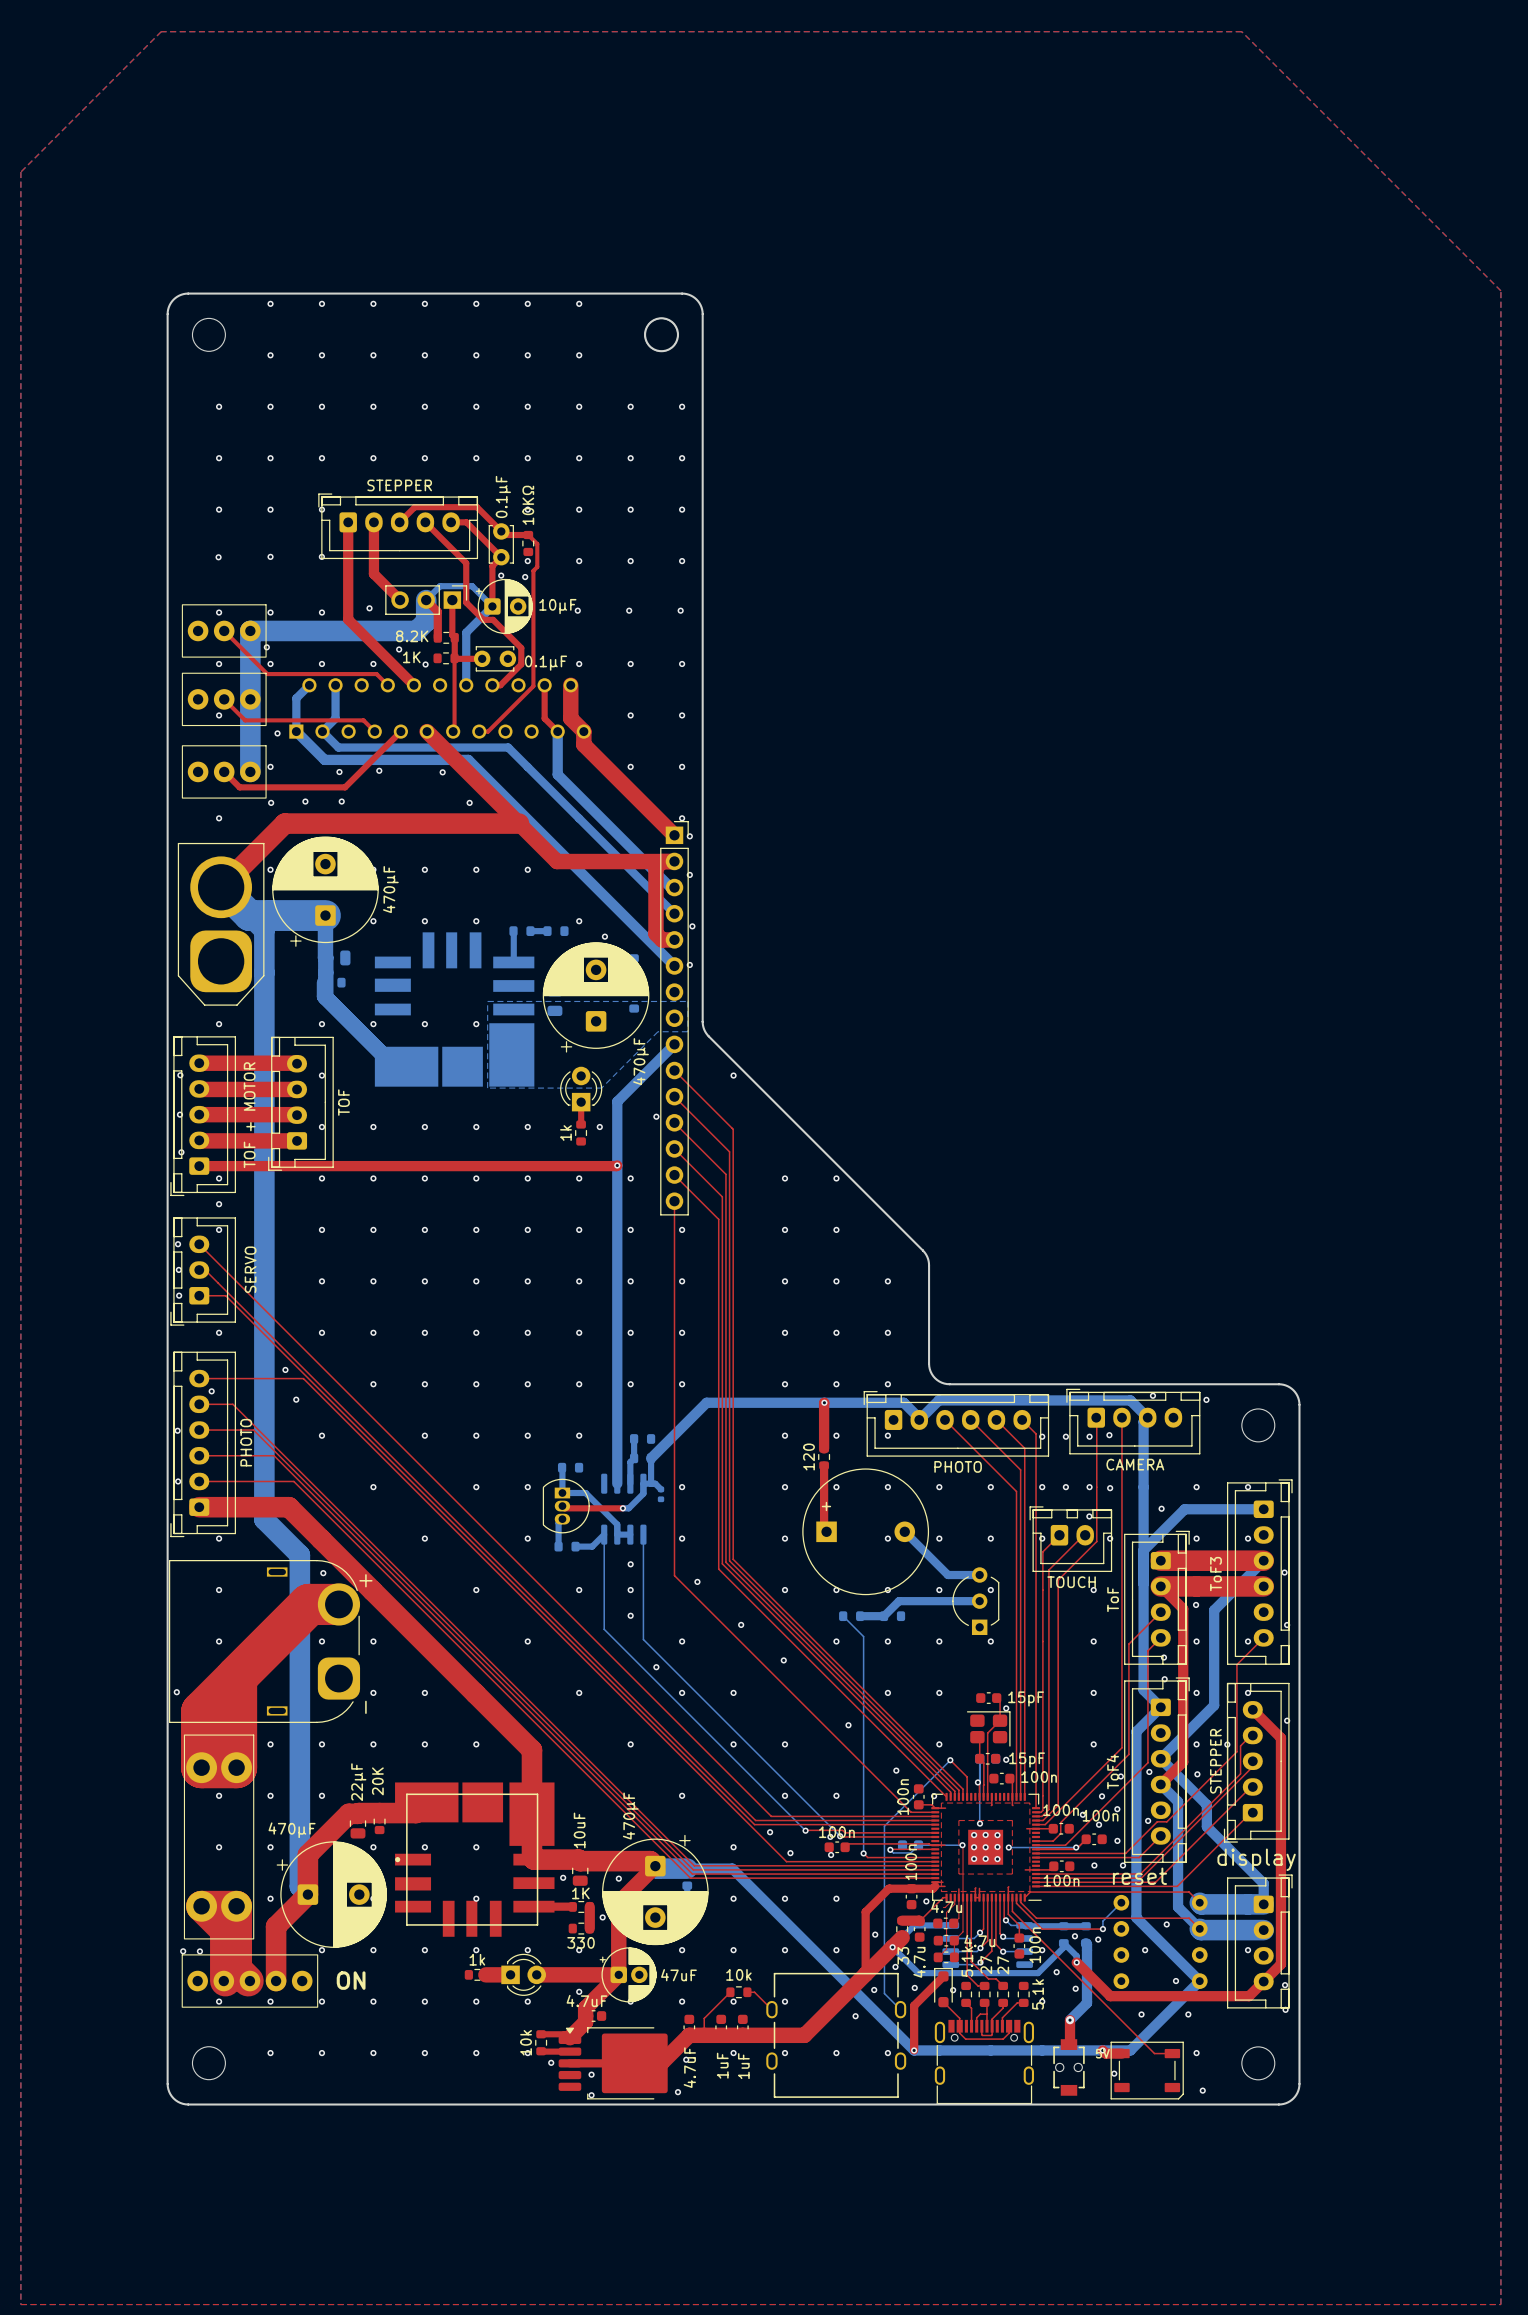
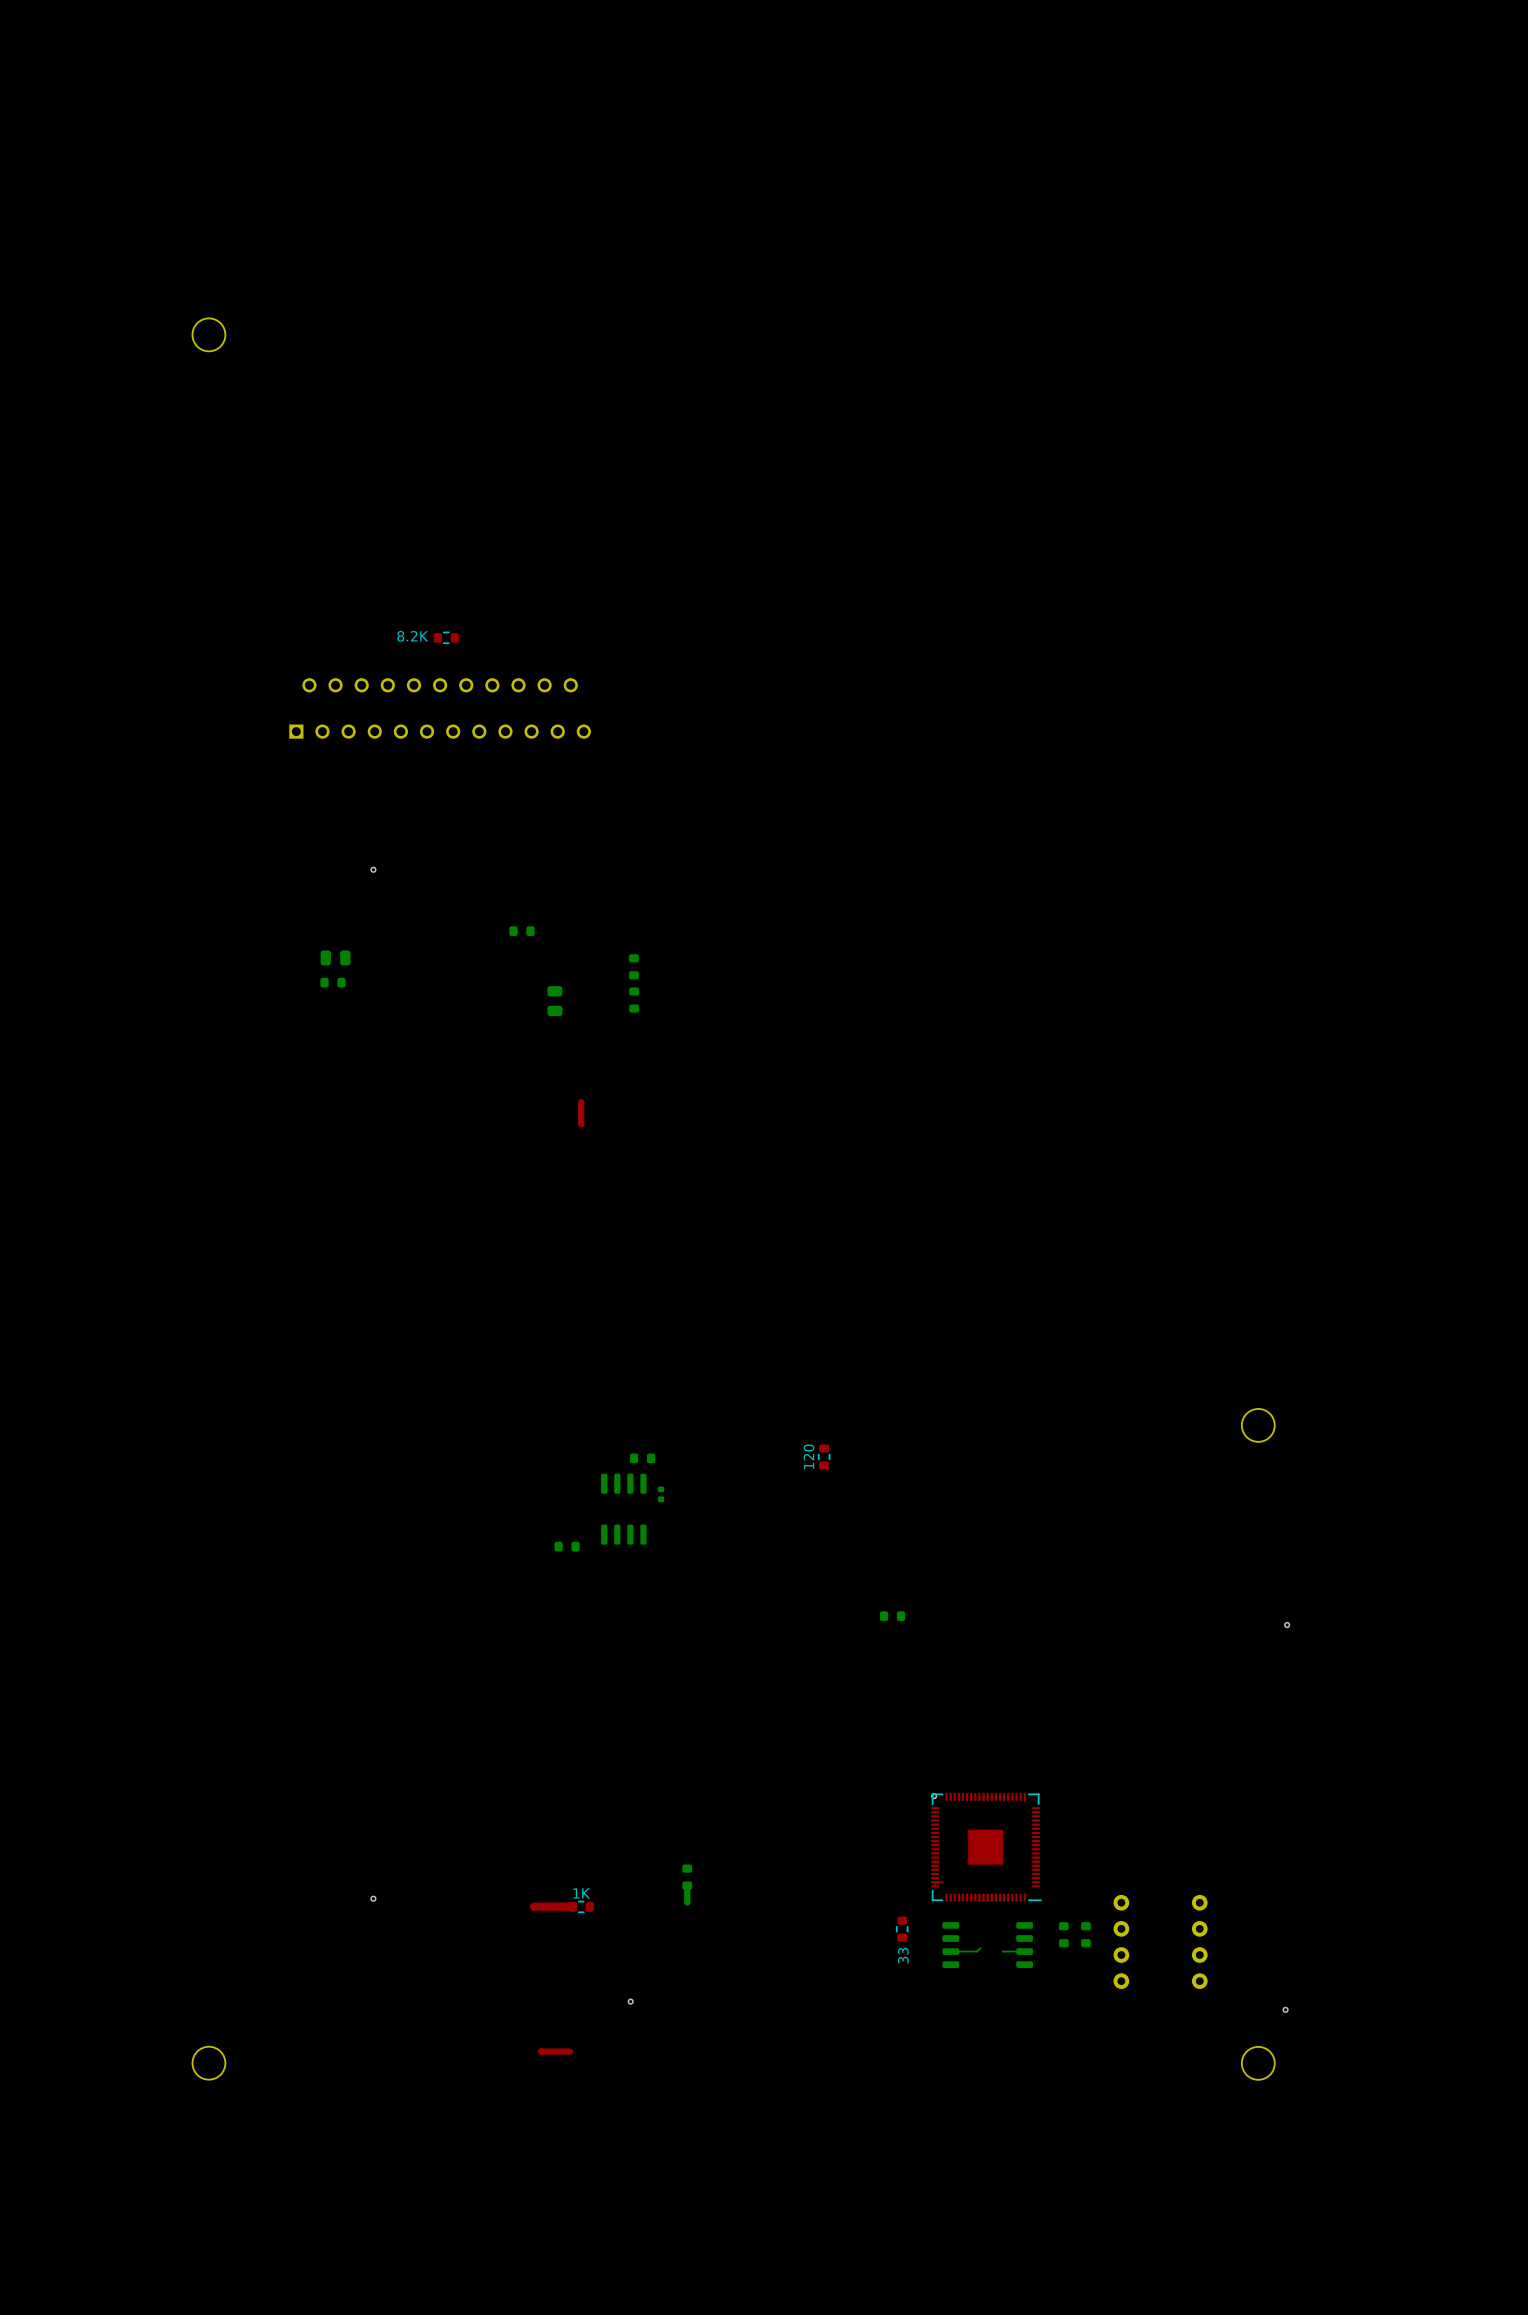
top zone outline: (161, 31) (1241, 31) (1500, 290) (1500, 2304) (20, 2304) (20, 172) (161, 31) -> none
board edge: (188, 293) (682, 293) (691, 295) (699, 303) (702, 314) (702, 1021) (705, 1031) (925, 1253) (929, 1265) (929, 1366) (933, 1376) (939, 1381) (949, 1384) (1278, 1384) (1289, 1387) (1298, 1398) (1299, 2083) (1296, 2094) (1289, 2101) (1278, 2104) (188, 2104) (177, 2101) (170, 2094) (167, 2083) (167, 314) (168, 307) (173, 299) (179, 295) (188, 293) -> none
via: (270, 303) -> none
via: (321, 303) -> none
via: (373, 303) -> none
via: (424, 303) -> none
via: (476, 303) -> none
via: (527, 303) -> none
via: (579, 303) -> none
round board edge: [644, 317, 680, 353] -> none
via: (270, 355) -> none
via: (321, 355) -> none
via: (373, 355) -> none
via: (424, 355) -> none
via: (476, 355) -> none
via: (527, 355) -> none
via: (579, 355) -> none
via: (219, 406) -> none
via: (270, 406) -> none
via: (321, 406) -> none
via: (373, 406) -> none
via: (424, 406) -> none
via: (476, 406) -> none
via: (527, 406) -> none
via: (579, 406) -> none
via: (630, 406) -> none
via: (682, 406) -> none
via: (219, 458) -> none
via: (270, 458) -> none
via: (321, 458) -> none
via: (373, 458) -> none
via: (424, 458) -> none
via: (476, 458) -> none
via: (527, 458) -> none
via: (579, 458) -> none
via: (630, 458) -> none
via: (682, 458) -> none
via: (219, 509) -> none
via: (270, 509) -> none
via: (321, 509) -> none
via: (527, 509) -> none
via: (579, 509) -> none
via: (630, 509) -> none
via: (682, 509) -> none
top track: (348, 522) (348, 619) (413, 685) -> none
top track: (373, 522) (373, 573) (400, 600) -> none
top track: (399, 522) (414, 507) (477, 507) (504, 535) (528, 535) (537, 544) (537, 566) (533, 570) (533, 686) (488, 731) (479, 731) -> none
top track: (425, 522) (466, 563) (466, 602) (483, 619) (493, 619) (521, 648) (521, 664) (500, 685) (492, 685) -> none
top track: (451, 522) (466, 522) (501, 557) (492, 566) (492, 606) -> none
STEPPER: (398, 526) -> none
part: 10KΩ (528, 543) -> none
part: 0.1μF (501, 544) -> none
via: (270, 556) -> none
via: (321, 556) -> none
via: (218, 557) -> none
via: (527, 561) -> none
via: (579, 561) -> none
via: (630, 561) -> none
via: (682, 561) -> none
via: (501, 575) -> none
via: (525, 577) -> none
top track: (426, 600) (437, 611) (437, 637) -> none
part: (426, 600) -> none
top track: (452, 600) (454, 658) -> none
part: 10μF (504, 606) -> none
via: (369, 608) -> none
via: (577, 610) -> none
via: (629, 610) -> none
via: (680, 610) -> none
via: (219, 612) -> none
via: (270, 612) -> none
via: (321, 612) -> none
top track: (224, 630) (267, 674) (376, 674) (387, 685) -> none
part: (224, 630) -> none
via: (266, 647) -> none
via: (399, 649) -> none
part: 1K (446, 658) -> none
top track: (454, 658) (482, 658) -> none
top track: (454, 658) (453, 731) -> none
part: 0.1μF (495, 658) -> none
via: (219, 663) -> none
via: (270, 663) -> none
via: (321, 663) -> none
via: (373, 663) -> none
via: (579, 663) -> none
via: (630, 663) -> none
via: (682, 663) -> none
via: (425, 664) -> none
bottom track: (309, 685) (296, 698) (296, 731) (324, 759) (468, 759) (674, 966) -> none
bottom track: (335, 685) (335, 718) (322, 731) (338, 747) (508, 747) (674, 913) -> none
bottom track: (466, 685) (466, 632) (492, 606) (472, 586) (440, 586) (426, 600) (426, 621) (416, 630) (250, 630) (250, 771) -> none
top track: (544, 685) (544, 718) (557, 731) -> none
top track: (570, 685) (570, 718) (583, 731) (583, 744) (674, 835) -> none
top track: (224, 699) (245, 720) (363, 720) (374, 731) -> none
part: (224, 699) -> none
via: (219, 715) -> none
via: (630, 715) -> none
via: (682, 715) -> none
top track: (400, 731) (345, 787) (239, 787) (224, 771) -> none
top track: (427, 731) (556, 861) (674, 861) -> none
bottom track: (557, 731) (557, 774) (670, 887) (674, 887) -> none
via: (277, 733) -> none
via: (270, 766) -> none
via: (630, 766) -> none
via: (682, 766) -> none
via: (379, 770) -> none
part: (224, 771) -> none
via: (339, 772) -> none
via: (442, 772) -> none
via: (305, 801) -> none
via: (341, 801) -> none
via: (271, 802) -> none
via: (469, 802) -> none
via: (219, 818) -> none
via: (682, 818) -> none
top track: (519, 823) (284, 823) (221, 887) -> none
via: (689, 836) -> none
top track: (662, 861) (655, 867) (655, 933) (662, 939) (674, 939) -> none
via: (270, 869) -> none
via: (424, 869) -> none
via: (476, 869) -> none
via: (527, 869) -> none
via: (689, 874) -> none
part: 470μF (325, 891) -> none
via: (373, 921) -> none
via: (424, 921) -> none
via: (476, 921) -> none
via: (579, 921) -> none
part: (221, 924) -> none
via: (692, 926) -> none
bottom track: (513, 931) (513, 962) -> none
bottom track: (530, 931) (547, 931) -> none
part: (555, 931) -> none
via: (604, 936) -> none
via: (689, 964) -> none
bottom track: (324, 982) (324, 996) (394, 1066) (406, 1066) -> none
bottom track: (325, 997) (325, 915) (249, 915) (221, 887) (264, 930) (264, 1519) (299, 1555) (299, 1886) (307, 1894) -> none
part: 470μF (596, 997) -> none
bottom zone outline: (487, 1001) (487, 1088) (601, 1088) (657, 1031) (687, 1031) (687, 1001) (487, 1001) -> none
part: (454, 1009) -> none
part: (674, 1018) -> none
via: (219, 1024) -> none
via: (321, 1024) -> none
via: (373, 1024) -> none
via: (424, 1024) -> none
via: (476, 1024) -> none
bottom track: (674, 1044) (617, 1101) (617, 1483) -> none
top track: (199, 1063) (297, 1063) -> none
top track: (674, 1070) (733, 1129) (733, 1559) (963, 1789) (963, 1796) -> none
via: (180, 1075) -> none
via: (321, 1075) -> none
via: (733, 1075) -> none
top track: (199, 1088) (297, 1089) -> none
part: (581, 1089) -> none
top track: (674, 1096) (729, 1151) (729, 1560) (958, 1790) (958, 1796) -> none
part: TOF (300, 1103) -> none
via: (179, 1114) -> none
top track: (199, 1114) (297, 1115) -> none
TOF + MOTOR: (203, 1116) -> none
via: (656, 1116) -> none
top track: (674, 1122) (725, 1174) (725, 1562) (954, 1791) (954, 1796) -> none
via: (321, 1127) -> none
via: (373, 1127) -> none
via: (424, 1127) -> none
via: (476, 1127) -> none
via: (527, 1127) -> none
via: (599, 1127) -> none
part: 1k (581, 1133) -> none
top track: (199, 1140) (297, 1140) -> none
top track: (674, 1149) (722, 1196) (722, 1563) (950, 1792) (950, 1796) -> none
via: (181, 1152) -> none
top track: (617, 1165) (199, 1166) -> none
via: (617, 1165) -> none
top track: (674, 1175) (718, 1219) (718, 1569) (946, 1796) -> none
via: (219, 1178) -> none
via: (321, 1178) -> none
via: (373, 1178) -> none
via: (424, 1178) -> none
via: (476, 1178) -> none
via: (527, 1178) -> none
via: (579, 1178) -> none
via: (630, 1178) -> none
via: (785, 1178) -> none
via: (836, 1178) -> none
top track: (674, 1201) (674, 1575) (911, 1812) (935, 1812) -> none
via: (219, 1204) -> none
via: (219, 1229) -> none
via: (321, 1229) -> none
via: (373, 1229) -> none
via: (424, 1229) -> none
via: (476, 1229) -> none
via: (527, 1229) -> none
via: (579, 1229) -> none
via: (630, 1229) -> none
via: (682, 1229) -> none
via: (785, 1229) -> none
via: (836, 1229) -> none
via: (178, 1244) -> none
top track: (199, 1244) (771, 1816) (935, 1816) -> none
via: (178, 1269) -> none
top track: (199, 1270) (205, 1270) (755, 1820) (935, 1820) -> none
SERVO: (203, 1271) -> none
via: (321, 1281) -> none
via: (373, 1281) -> none
via: (424, 1281) -> none
via: (476, 1281) -> none
via: (527, 1281) -> none
via: (579, 1281) -> none
via: (630, 1281) -> none
via: (682, 1281) -> none
via: (785, 1281) -> none
via: (836, 1281) -> none
via: (887, 1281) -> none
via: (179, 1295) -> none
top track: (199, 1295) (225, 1295) (754, 1824) (935, 1824) -> none
via: (219, 1332) -> none
via: (321, 1332) -> none
via: (373, 1332) -> none
via: (424, 1332) -> none
via: (476, 1332) -> none
via: (527, 1332) -> none
via: (579, 1332) -> none
via: (630, 1332) -> none
via: (682, 1332) -> none
via: (785, 1332) -> none
via: (836, 1332) -> none
via: (887, 1332) -> none
via: (285, 1369) -> none
top track: (199, 1378) (303, 1378) (786, 1861) (935, 1861) -> none
via: (373, 1384) -> none
via: (424, 1384) -> none
via: (476, 1384) -> none
via: (527, 1384) -> none
via: (579, 1384) -> none
via: (630, 1384) -> none
via: (682, 1384) -> none
via: (785, 1384) -> none
via: (836, 1384) -> none
via: (887, 1384) -> none
via: (211, 1391) -> none
via: (1152, 1395) -> none
via: (296, 1399) -> none
via: (1206, 1399) -> none
top track: (824, 1402) (824, 1448) -> none
via: (824, 1402) -> none
top track: (199, 1404) (232, 1404) (694, 1865) (935, 1865) -> none
top track: (1096, 1417) (1096, 1541) (1058, 1580) (1058, 1805) (1043, 1820) (1036, 1820) -> none
top track: (1121, 1417) (1121, 1747) (1045, 1824) (1036, 1824) -> none
top track: (945, 1420) (1016, 1491) (1016, 1796) -> none
top track: (970, 1420) (1020, 1469) (1020, 1796) -> none
top track: (996, 1420) (1024, 1448) (1024, 1796) -> none
top track: (1022, 1420) (1036, 1433) (1036, 1808) -> none
part: CAMERA (1133, 1421) -> none
part: PHOTO (956, 1423) -> none
via: (177, 1430) -> none
top track: (199, 1430) (253, 1430) (693, 1869) (935, 1869) -> none
via: (321, 1435) -> none
via: (424, 1435) -> none
via: (476, 1435) -> none
via: (527, 1435) -> none
via: (579, 1435) -> none
via: (785, 1435) -> none
via: (836, 1435) -> none
via: (887, 1435) -> none
via: (1109, 1435) -> none
via: (1042, 1436) -> none
via: (1065, 1436) -> none
via: (1089, 1436) -> none
bottom track: (634, 1438) (634, 1458) (630, 1462) (630, 1483) -> none
part: (642, 1438) -> none
part: PHOTO (203, 1444) -> none
top track: (199, 1455) (274, 1455) (692, 1874) (935, 1874) -> none
top track: (824, 1465) (824, 1529) (826, 1531) -> none
bottom track: (562, 1467) (562, 1493) (585, 1493) (617, 1524) (617, 1534) (630, 1534) -> none
part: (570, 1467) -> none
via: (178, 1481) -> none
top track: (199, 1481) (293, 1481) (690, 1878) (935, 1878) -> none
bottom track: (650, 1483) (651, 1458) (706, 1402) (903, 1402) (919, 1420) (938, 1400) (1130, 1400) (1147, 1417) (1143, 1421) (1143, 1690) (1160, 1707) (1136, 1731) (1136, 1917) (1199, 1981) (1130, 2050) (914, 2050) (732, 1868) (657, 1868) (655, 1866) -> none
via: (373, 1487) -> none
via: (476, 1487) -> none
via: (527, 1487) -> none
via: (682, 1487) -> none
via: (785, 1487) -> none
via: (836, 1487) -> none
via: (887, 1487) -> none
via: (939, 1487) -> none
via: (990, 1487) -> none
via: (1042, 1487) -> none
via: (1065, 1487) -> none
via: (1089, 1487) -> none
via: (1196, 1487) -> none
via: (1248, 1487) -> none
via: (1110, 1488) -> none
bottom track: (661, 1489) (655, 1483) (643, 1483) (643, 1493) (628, 1508) (622, 1508) -> none
top track: (562, 1506) (564, 1508) (622, 1508) -> none
part: (566, 1506) -> none
top track: (199, 1507) (289, 1507) (531, 1750) (531, 1857) (533, 1859) (650, 1861) (655, 1866) (618, 1902) (618, 1974) -> none
via: (622, 1508) -> none
via: (1161, 1508) -> none
bottom track: (1263, 1509) (1184, 1509) (1143, 1550) -> none
via: (1089, 1516) -> none
bottom track: (562, 1519) (558, 1523) (558, 1546) -> none
part: (865, 1531) -> none
bottom track: (904, 1531) (947, 1575) (979, 1575) -> none
bottom track: (643, 1534) (643, 1639) (840, 1836) -> none
top track: (1059, 1535) (1042, 1551) (1042, 1810) (1035, 1812) -> none
top track: (1085, 1535) (1048, 1569) (1048, 1809) (1042, 1816) (1036, 1816) -> none
via: (219, 1538) -> none
via: (424, 1538) -> none
via: (527, 1538) -> none
via: (682, 1538) -> none
via: (785, 1538) -> none
via: (887, 1538) -> none
via: (939, 1538) -> none
via: (990, 1538) -> none
via: (1042, 1538) -> none
via: (1110, 1538) -> none
via: (1196, 1538) -> none
via: (1248, 1538) -> none
part: TOUCH (1070, 1539) -> none
bottom track: (575, 1546) (592, 1546) (604, 1534) (604, 1629) (805, 1830) -> none
top track: (1160, 1560) (1263, 1560) -> none
bottom track: (1263, 1560) (1214, 1610) (1214, 1705) (1160, 1758) (1206, 1804) (1206, 1826) (1263, 1883) (1263, 1904) (1201, 1904) (1199, 1902) -> none
via: (630, 1564) -> none
part: ToF3 (1259, 1572) -> none
via: (1284, 1572) -> none
via: (323, 1573) -> none
via: (697, 1581) -> none
top track: (1263, 1586) (1160, 1586) (1183, 1608) (1183, 1762) (1160, 1784) -> none
via: (219, 1590) -> none
via: (476, 1590) -> none
via: (579, 1590) -> none
via: (630, 1590) -> none
via: (785, 1590) -> none
via: (836, 1590) -> none
via: (887, 1590) -> none
via: (939, 1590) -> none
via: (990, 1590) -> none
via: (1093, 1590) -> none
part: ToF (1156, 1597) -> none
part: (975, 1601) -> none
bottom track: (979, 1601) (899, 1601) (884, 1616) (860, 1616) -> none
top track: (338, 1604) (309, 1604) (201, 1711) (201, 1767) (236, 1767) (236, 1676) -> none
via: (1196, 1604) -> none
top track: (1160, 1612) (1128, 1644) (1128, 1754) (1060, 1822) (1060, 1833) (1053, 1841) (1036, 1841) -> none
via: (630, 1615) -> none
bottom track: (843, 1616) (863, 1636) (863, 1853) -> none
part: (851, 1616) -> none
via: (741, 1624) -> none
top track: (1160, 1637) (1147, 1650) (1147, 1762) (1065, 1845) (1036, 1845) -> none
top track: (1263, 1637) (1236, 1664) (1236, 1751) (1166, 1821) (1157, 1821) (1125, 1853) (1036, 1853) -> none
via: (219, 1641) -> none
part: (264, 1641) -> none
via: (321, 1641) -> none
via: (373, 1641) -> none
via: (527, 1641) -> none
via: (682, 1641) -> none
via: (836, 1641) -> none
via: (887, 1641) -> none
via: (939, 1641) -> none
via: (990, 1641) -> none
via: (1093, 1641) -> none
via: (1196, 1641) -> none
via: (1248, 1641) -> none
via: (1163, 1657) -> none
via: (783, 1660) -> none
via: (656, 1667) -> none
via: (1164, 1679) -> none
via: (176, 1692) -> none
via: (373, 1692) -> none
via: (424, 1692) -> none
via: (579, 1692) -> none
via: (682, 1692) -> none
via: (733, 1692) -> none
via: (887, 1692) -> none
via: (939, 1692) -> none
via: (1093, 1692) -> none
via: (1196, 1692) -> none
via: (1248, 1692) -> none
part: 15pF (988, 1698) -> none
top track: (996, 1698) (1000, 1701) (1000, 1720) (987, 1733) (987, 1796) -> none
via: (1006, 1708) -> none
top track: (1252, 1709) (1280, 1737) (1280, 1964) (1249, 1996) (1110, 1996) (1076, 1962) -> none
via: (1287, 1720) -> none
via: (848, 1725) -> none
part: (988, 1728) -> none
top track: (1253, 1733) (1240, 1745) (1240, 1773) (1140, 1874) (1036, 1874) -> none
top track: (977, 1737) (979, 1739) (979, 1758) (983, 1762) (983, 1796) -> none
via: (270, 1744) -> none
via: (321, 1744) -> none
via: (373, 1744) -> none
via: (424, 1744) -> none
via: (476, 1744) -> none
via: (630, 1744) -> none
via: (733, 1744) -> none
via: (785, 1744) -> none
via: (939, 1744) -> none
via: (1093, 1744) -> none
via: (1196, 1744) -> none
via: (1227, 1744) -> none
bottom track: (979, 1758) (979, 1823) -> none
part: (987, 1758) -> none
top track: (1253, 1758) (1253, 1766) (1141, 1878) (1036, 1878) -> none
via: (1006, 1759) -> none
top track: (950, 1760) (967, 1776) (967, 1796) -> none
bottom track: (950, 1760) (884, 1826) (884, 1993) (900, 2009) -> none
via: (950, 1760) -> none
text: 15pF (1027, 1760) -> none
STEPPER: (1256, 1762) -> none
via: (896, 1770) -> none
part: ToF4 (1156, 1770) -> none
via: (1149, 1771) -> none
via: (1197, 1774) -> none
via: (1120, 1776) -> none
part: 100n (1001, 1778) -> none
top track: (1009, 1778) (1012, 1781) (1012, 1805) -> none
top track: (977, 1782) (979, 1796) -> none
via: (977, 1782) -> none
bottom track: (1160, 1784) (1178, 1801) (1178, 1907) (1201, 1930) (1263, 1930) -> none
top track: (1253, 1784) (1155, 1882) (1036, 1882) -> none
via: (219, 1795) -> none
via: (270, 1795) -> none
via: (321, 1795) -> none
via: (682, 1795) -> none
via: (785, 1795) -> none
via: (836, 1795) -> none
part: 100n (918, 1796) -> none
top track: (991, 1796) (991, 1805) -> none
via: (1102, 1796) -> none
top track: (426, 1802) (416, 1813) (348, 1813) (307, 1854) (307, 1894) (276, 1926) (276, 1981) -> none
top zone outline: (941, 1803) (941, 1891) (1029, 1891) (1029, 1803) (941, 1803) -> none
top track: (918, 1804) (931, 1804) (935, 1808) (945, 1808) -> none
via: (1117, 1809) -> none
top track: (1253, 1810) (1177, 1886) (1036, 1886) -> none
via: (1082, 1814) -> none
top zone outline: (958, 1820) (958, 1874) (1012, 1874) (1012, 1820) (958, 1820) -> none
via: (1148, 1820) -> none
part: 20K (379, 1821) -> none
part: 22μF (357, 1823) -> none
via: (979, 1823) -> none
via: (1099, 1824) -> none
top track: (1026, 1828) (1053, 1828) -> none
part: 100n (1061, 1828) -> none
top track: (805, 1830) (842, 1830) (845, 1832) (935, 1832) -> none
via: (805, 1830) -> none
via: (770, 1832) -> none
via: (985, 1834) -> none
via: (974, 1835) -> none
via: (997, 1835) -> none
top track: (1160, 1835) (1139, 1857) (1036, 1857) -> none
part: (219, 1836) -> none
via: (830, 1836) -> none
top track: (840, 1836) (935, 1836) -> none
via: (840, 1836) -> none
top track: (1086, 1839) (1076, 1849) (1036, 1849) -> none
part: 100n (1094, 1839) -> none
via: (1117, 1840) -> none
part: (910, 1845) -> none
top track: (945, 1845) (848, 1843) (845, 1847) -> none
top track: (962, 1845) (963, 1931) (954, 1940) -> none
bottom track: (962, 1845) (918, 1845) (910, 1852) (893, 1852) (890, 1849) -> none
via: (962, 1845) -> none
via: (219, 1847) -> none
via: (270, 1847) -> none
via: (373, 1847) -> none
via: (424, 1847) -> none
via: (476, 1847) -> none
via: (733, 1847) -> none
part: 100n (837, 1847) -> none
via: (974, 1847) -> none
via: (985, 1847) -> none
via: (997, 1847) -> none
bottom track: (1008, 1847) (1076, 1847) -> none
via: (1008, 1847) -> none
via: (1076, 1847) -> none
via: (890, 1849) -> none
top track: (935, 1849) (890, 1849) -> none
via: (790, 1853) -> none
top track: (863, 1853) (867, 1857) (935, 1857) -> none
via: (863, 1853) -> none
via: (831, 1854) -> none
via: (974, 1858) -> none
via: (985, 1858) -> none
part: (474, 1859) -> none
via: (997, 1859) -> none
text: display (1256, 1859) -> none
via: (1094, 1865) -> none
via: (1123, 1865) -> none
top track: (1053, 1866) (1050, 1869) (1025, 1869) -> none
part: 100n (1061, 1866) -> none
part: 10uF (580, 1870) -> none
text: reset (1139, 1876) -> none
via: (563, 1877) -> none
via: (618, 1878) -> none
top track: (945, 1886) (935, 1886) (932, 1888) (888, 1888) (865, 1911) (865, 1974) -> none
top track: (1008, 1886) (1008, 1914) (1019, 1925) (1019, 1938) -> none
top track: (975, 1887) (975, 1897) (979, 1897) (979, 1888) -> none
top track: (958, 1888) (958, 1918) (953, 1923) -> none
part: 470μF (655, 1890) -> none
part: 470μF (331, 1894) -> none
part: 100n (911, 1896) -> none
top track: (946, 1897) (943, 1897) (919, 1921) (902, 1920) -> none
top track: (950, 1897) (950, 1902) (943, 1907) -> none
top track: (954, 1897) (954, 1904) (946, 1912) (946, 1949) (938, 1957) -> none
top track: (967, 1897) (967, 1975) (977, 1985) (984, 1985) -> none
top track: (971, 1897) (971, 1961) (988, 1978) (996, 1978) (1003, 1985) -> none
top track: (983, 1897) (983, 1929) (979, 1932) -> none
top track: (987, 1897) (987, 1940) (980, 1948) -> none
top track: (991, 1897) (991, 1951) (980, 1962) -> none
top track: (995, 1897) (995, 1944) (1003, 1951) -> none
top track: (1000, 1897) (1000, 1933) (1003, 1936) -> none
top track: (1004, 1897) (1004, 1918) (1005, 1920) -> none
top track: (1012, 1897) (1012, 1911) (1154, 2053) (1172, 2053) -> none
top track: (1016, 1897) (1016, 1903) (1042, 1929) (1102, 1929) -> none
top track: (1020, 1897) (1020, 1902) (1036, 1918) (1189, 1918) (1199, 1928) -> none
top track: (1024, 1897) (1030, 1892) (1189, 1892) (1199, 1902) -> none
via: (270, 1898) -> none
via: (476, 1898) -> none
via: (733, 1898) -> none
via: (785, 1898) -> none
via: (836, 1898) -> none
via: (926, 1901) -> none
bottom track: (1121, 1902) (1102, 1921) (1102, 1929) -> none
top track: (589, 1906) (589, 1928) -> none
via: (602, 1917) -> none
bottom track: (1005, 1920) (1011, 1925) (1085, 1926) -> none
via: (1005, 1920) -> none
part: 4.7u (945, 1923) -> none
via: (1166, 1924) -> none
bottom track: (950, 1925) (914, 1925) (892, 1947) (918, 1973) (1038, 1973) (1063, 1947) (1063, 1943) (1076, 1956) (1076, 1962) -> none
part: 330 (581, 1928) -> none
part: 4.7u (919, 1929) -> none
via: (1102, 1929) -> none
bottom track: (979, 1932) (974, 1938) (950, 1938) -> none
via: (979, 1932) -> none
via: (875, 1934) -> none
bottom track: (1003, 1936) (1004, 1938) (1024, 1938) -> none
via: (1003, 1936) -> none
via: (1074, 1936) -> none
top track: (902, 1937) (804, 2035) (689, 2035) (661, 2063) (569, 2063) -> none
via: (1098, 1939) -> none
part: 4.7u (946, 1940) -> none
top track: (954, 1940) (954, 1957) -> none
part: (1259, 1941) -> none
bottom track: (1085, 1943) (1087, 2003) (1070, 2020) -> none
part: 100n (1019, 1946) -> none
via: (892, 1947) -> none
via: (980, 1948) -> none
via: (321, 1950) -> none
via: (373, 1950) -> none
via: (424, 1950) -> none
via: (476, 1950) -> none
via: (527, 1950) -> none
via: (579, 1950) -> none
via: (682, 1950) -> none
via: (733, 1950) -> none
via: (785, 1950) -> none
via: (836, 1950) -> none
via: (1042, 1950) -> none
via: (1145, 1950) -> none
via: (1248, 1950) -> none
via: (183, 1951) -> none
via: (199, 1951) -> none
via: (1003, 1951) -> none
part: (946, 1957) -> none
bottom track: (980, 1962) (978, 1964) (950, 1964) -> none
via: (980, 1962) -> none
via: (1076, 1962) -> none
via: (895, 1966) -> none
via: (1056, 1972) -> none
part: 1k (477, 1974) -> none
top track: (485, 1974) (510, 1974) -> none
part: (523, 1974) -> none
top track: (536, 1974) (618, 1974) -> none
top track: (618, 1974) (585, 2007) (585, 2022) (569, 2037) -> none
part: 47uF (628, 1974) -> none
top track: (943, 1976) (914, 2005) (914, 2050) -> none
text: ON (351, 1980) -> none
top track: (225, 1981) (225, 1930) (201, 1906) (236, 1906) (236, 1969) (248, 1981) -> none
part: (249, 1981) -> none
via: (1176, 1981) -> none
via: (1285, 1985) -> none
via: (914, 1987) -> none
part: (943, 1987) -> none
via: (1075, 1988) -> none
via: (874, 1989) -> none
via: (953, 1990) -> none
via: (579, 1991) -> none
top track: (730, 1992) (704, 2018) (704, 2035) -> none
part: 10k (738, 1992) -> none
top track: (747, 1992) (754, 1992) (771, 2009) -> none
part: 5.1k (966, 1994) -> none
part: 27 (984, 1994) -> none
part: 27 (1003, 1994) -> none
part: 5.1k (1023, 1994) -> none
via: (219, 2001) -> none
via: (270, 2001) -> none
via: (321, 2001) -> none
via: (373, 2001) -> none
via: (424, 2001) -> none
via: (476, 2001) -> none
via: (527, 2001) -> none
via: (682, 2001) -> none
via: (733, 2001) -> none
via: (785, 2001) -> none
via: (1042, 2001) -> none
top track: (943, 2002) (959, 2018) (959, 2033) (965, 2039) (1003, 2039) (1009, 2033) (1009, 2026) -> none
top track: (966, 2002) (971, 2008) (971, 2026) -> none
top track: (984, 2002) (986, 2005) (986, 2026) -> none
top track: (1003, 2002) (1003, 2008) (992, 2019) (992, 2034) (982, 2035) (981, 2026) -> none
top track: (1023, 2002) (1017, 2002) (1002, 2017) (1002, 2026) -> none
top track: (986, 2014) (980, 2014) (976, 2017) (976, 2026) -> none
via: (1141, 2014) -> none
via: (1188, 2014) -> none
part: 4.7uF (593, 2016) -> none
via: (855, 2016) -> none
top track: (1070, 2020) (1068, 2044) -> none
via: (1070, 2020) -> none
part: 4.7uF (689, 2027) -> none
part: 1uF (721, 2027) -> none
part: 1uF (742, 2027) -> none
top track: (541, 2034) (564, 2034) (569, 2039) -> none
part: (836, 2035) -> none
part: 10k (541, 2042) -> none
via: (914, 2050) -> none
top track: (1102, 2050) (1105, 2053) (1121, 2053) -> none
via: (1102, 2050) -> none
via: (270, 2053) -> none
via: (321, 2053) -> none
via: (373, 2053) -> none
via: (424, 2053) -> none
via: (476, 2053) -> none
via: (527, 2053) -> none
via: (733, 2053) -> none
via: (785, 2053) -> none
via: (836, 2053) -> none
via: (887, 2053) -> none
via: (1196, 2053) -> none
via: (686, 2059) -> none
via: (551, 2062) -> none
part: (984, 2062) -> none
part: (613, 2063) -> none
part: (1068, 2067) -> none
part: (1147, 2070) -> none
via: (1114, 2073) -> none
via: (591, 2074) -> none
via: (1202, 2090) -> none
via: (677, 2092) -> none
via: (591, 2095) -> none

